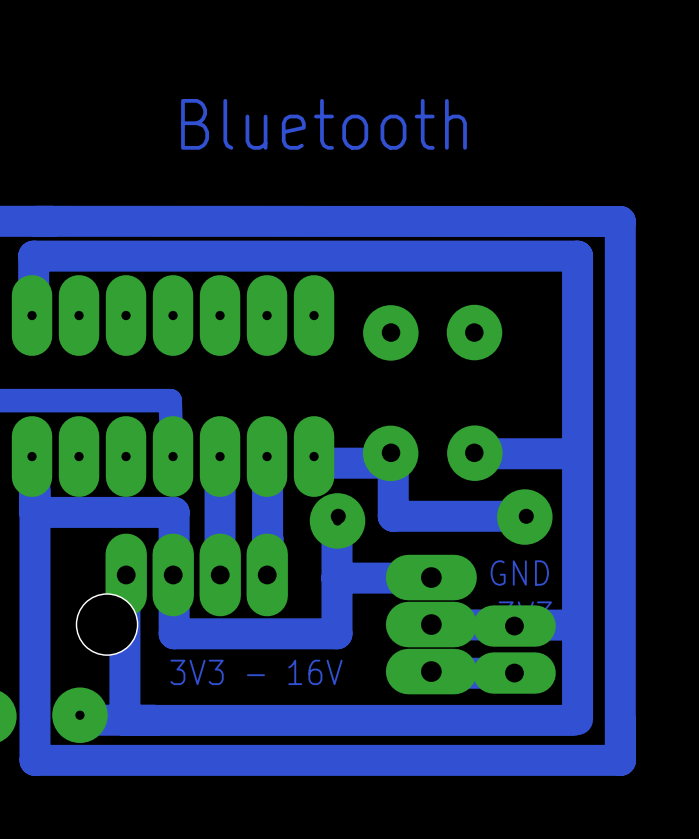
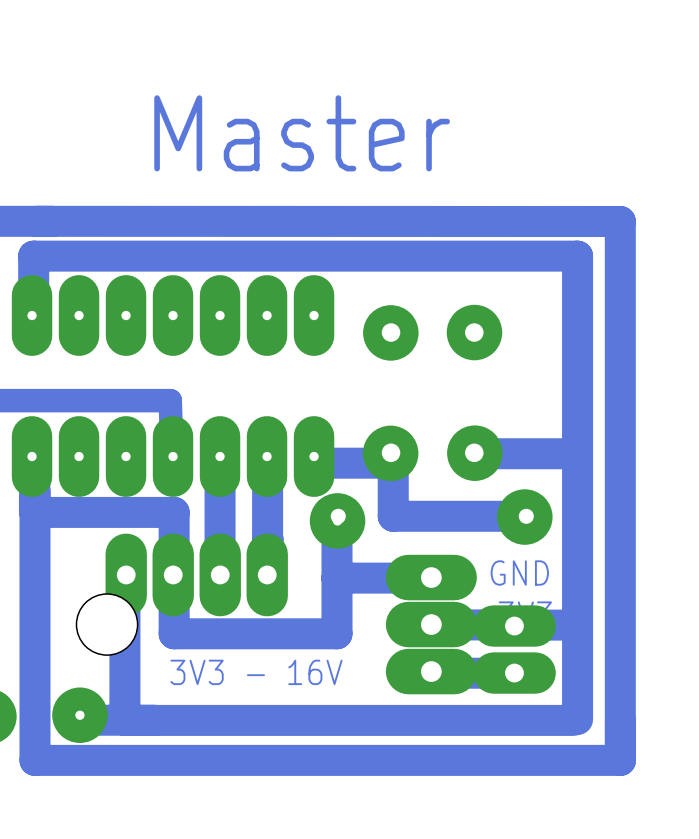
text: Bluetooth (324, 124) -> none
text: none -> Master (302, 133)

